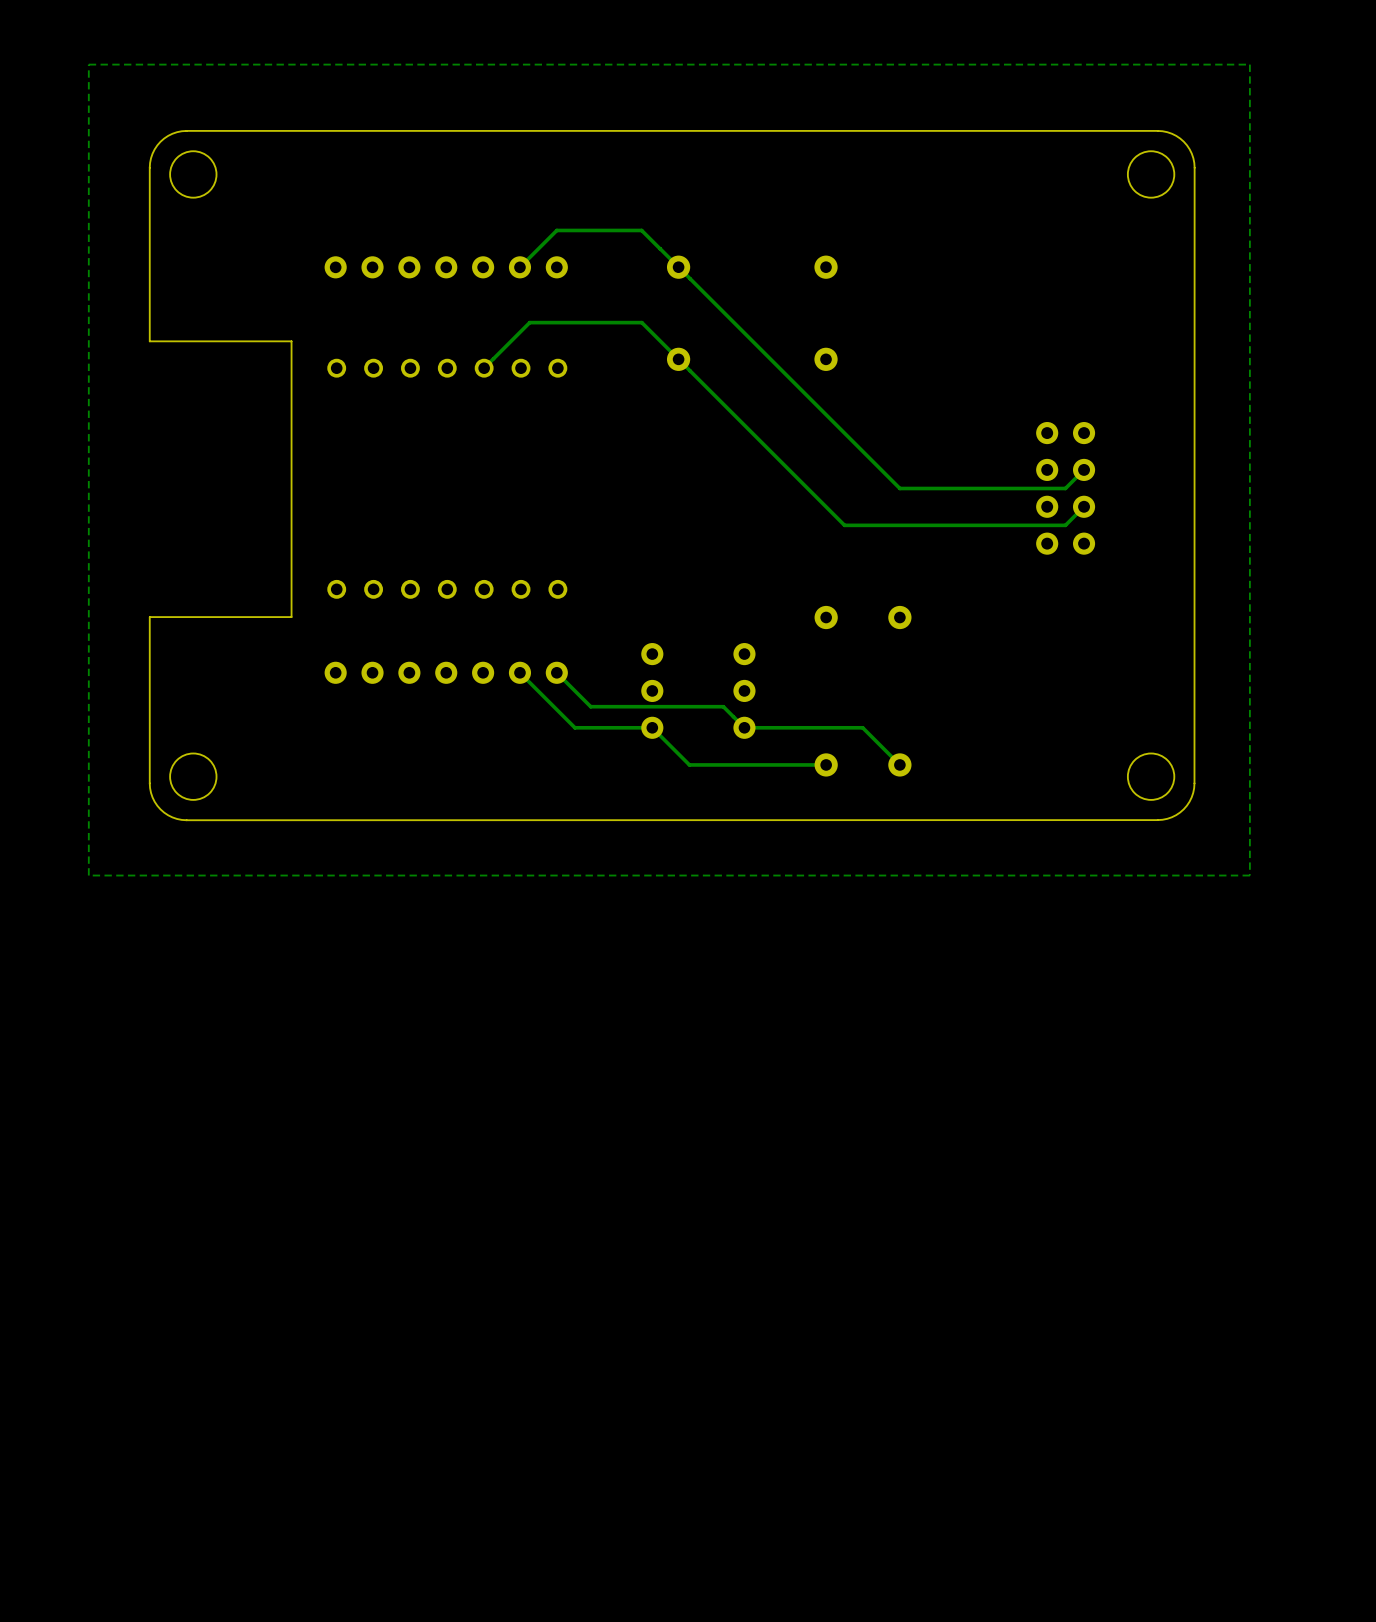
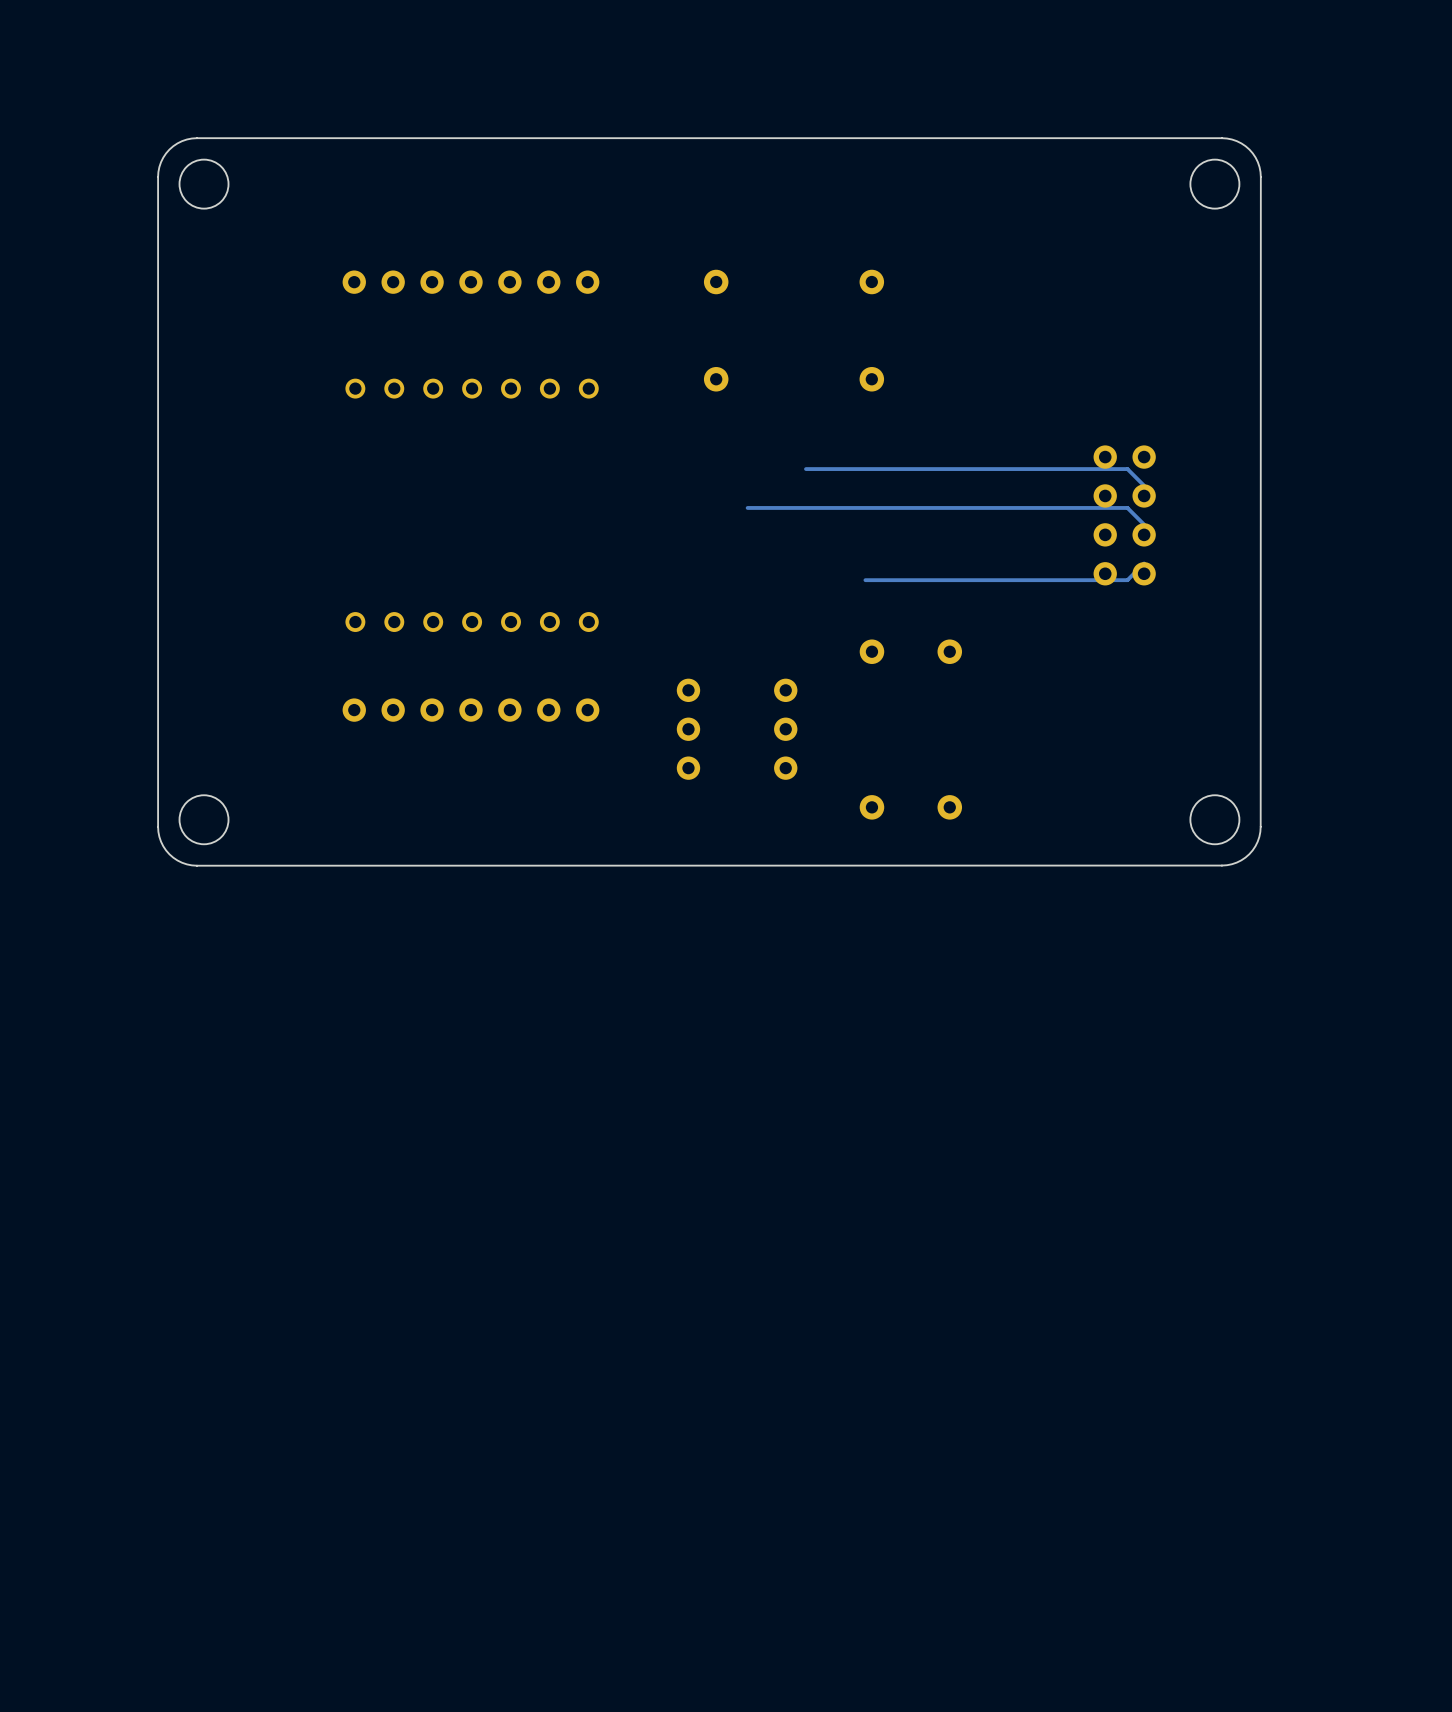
zone outline: (1249, 64) (88, 64) (88, 875) (1249, 875) (1249, 64) -> none
track: (519, 267) (556, 230) (641, 230) (899, 488) (1065, 488) (1084, 469) -> none
board edge: (149, 341) (291, 341) (291, 617) (149, 617) -> (158, 360) (158, 651)
track: (484, 368) (529, 322) (641, 322) (844, 525) (1065, 525) (1084, 506) -> none
track: none -> (806, 469) (1127, 469) (1144, 485)
track: none -> (747, 507) (1127, 507) (1144, 524)
track: none -> (1144, 563) (1127, 580) (865, 580)
track: (519, 672) (574, 727) (652, 727) (689, 764) (826, 764) -> none
track: (556, 672) (590, 706) (723, 706) (744, 727) (862, 727) (899, 764) -> none

